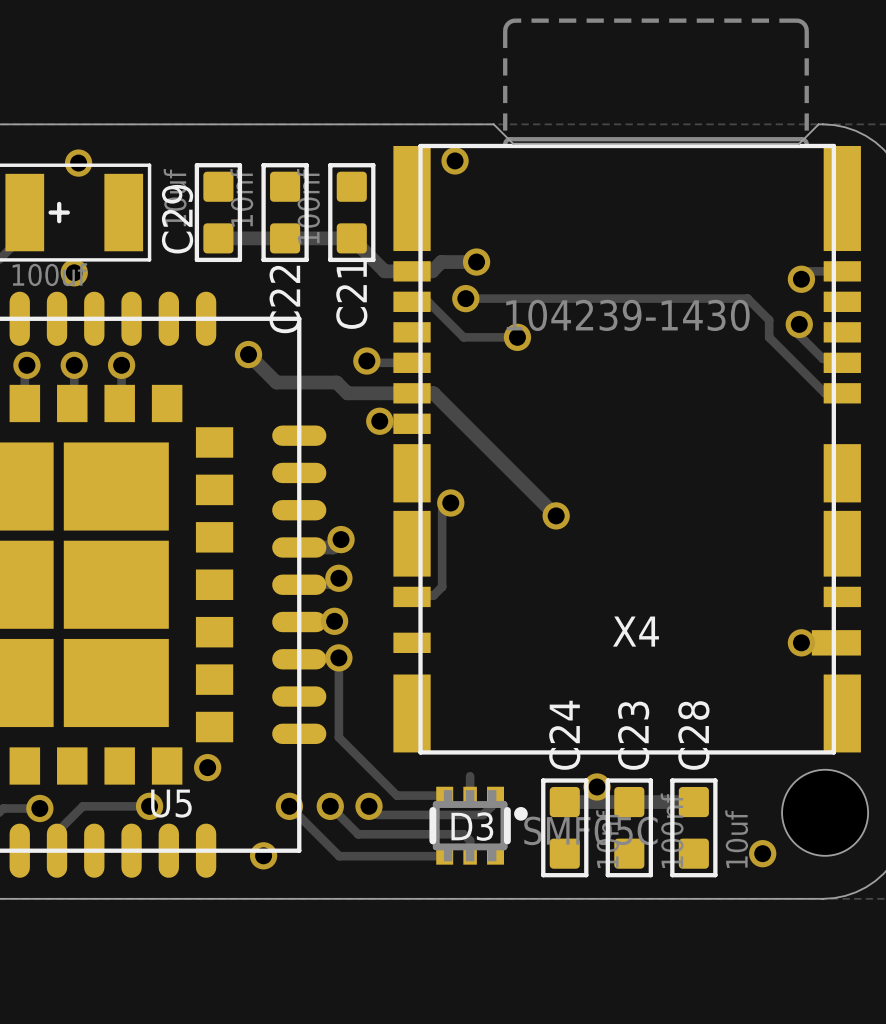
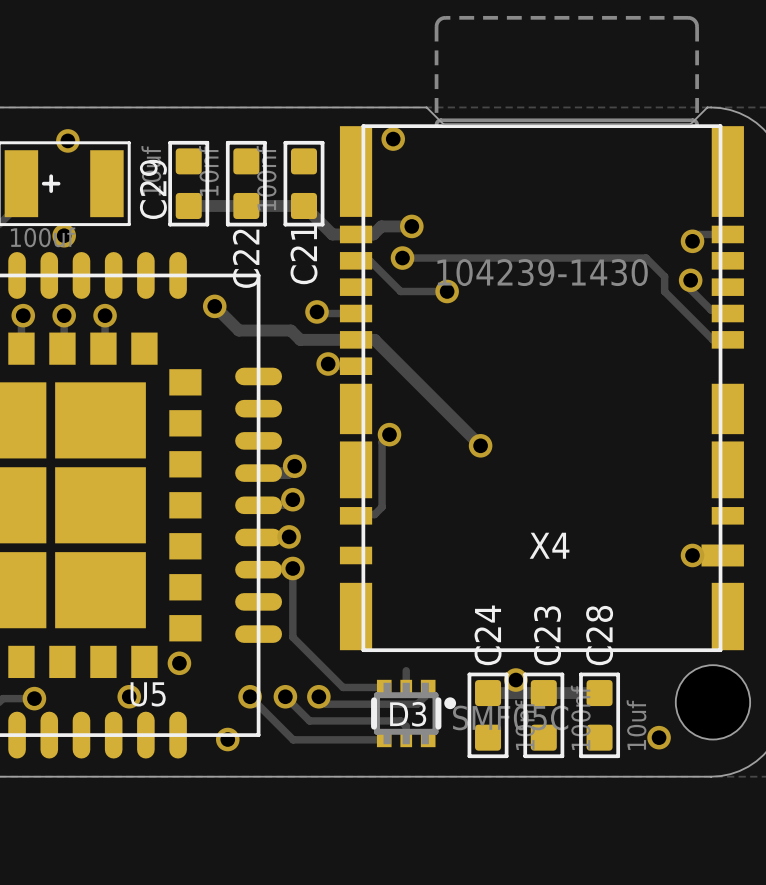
track: (149, 806) (82, 806) (57, 832) (57, 850) -> none

